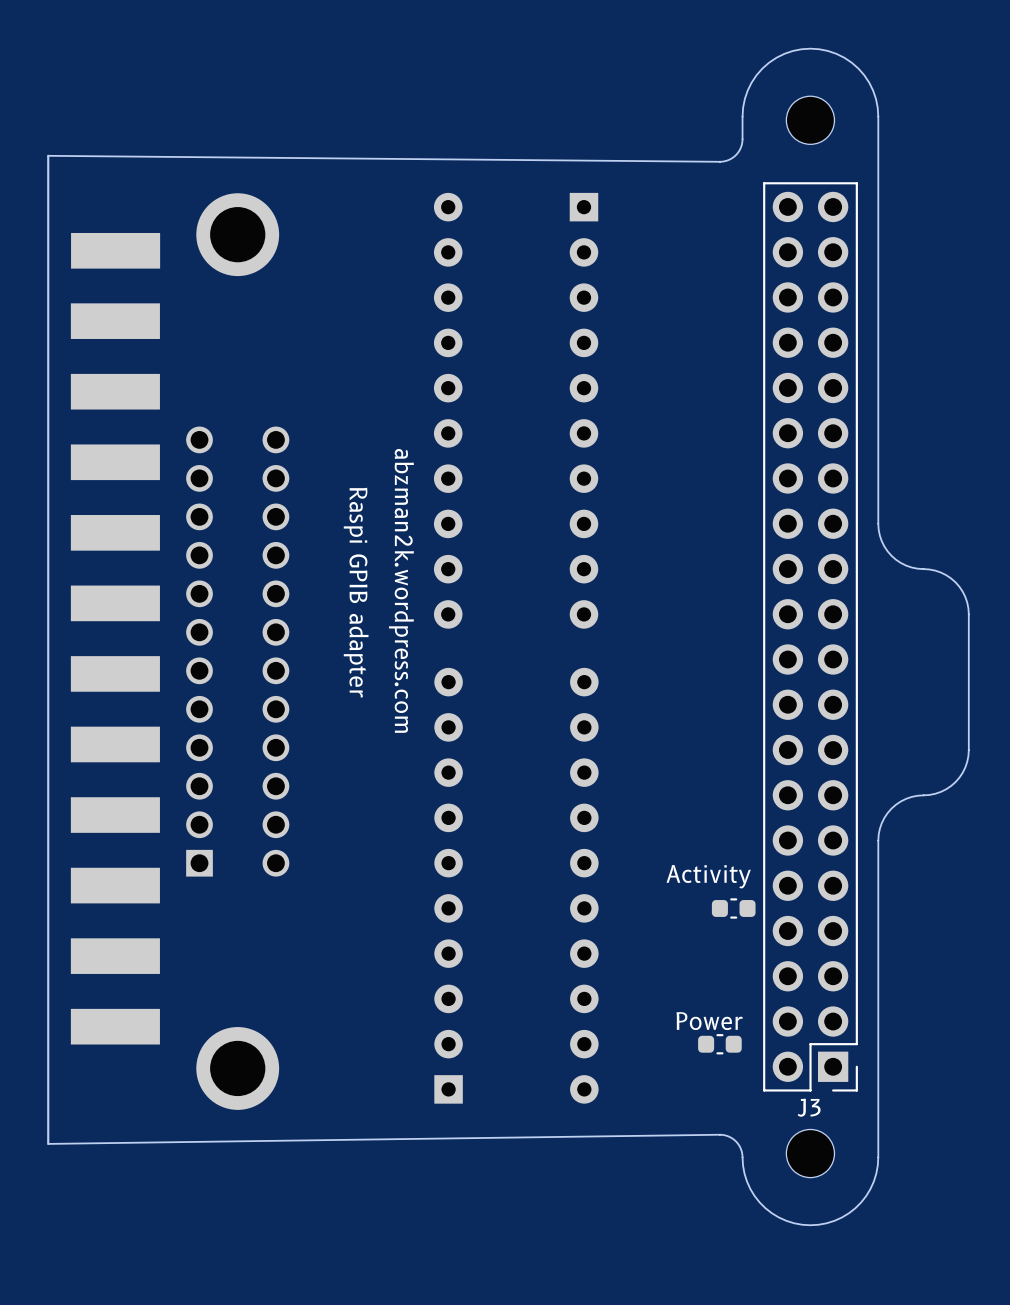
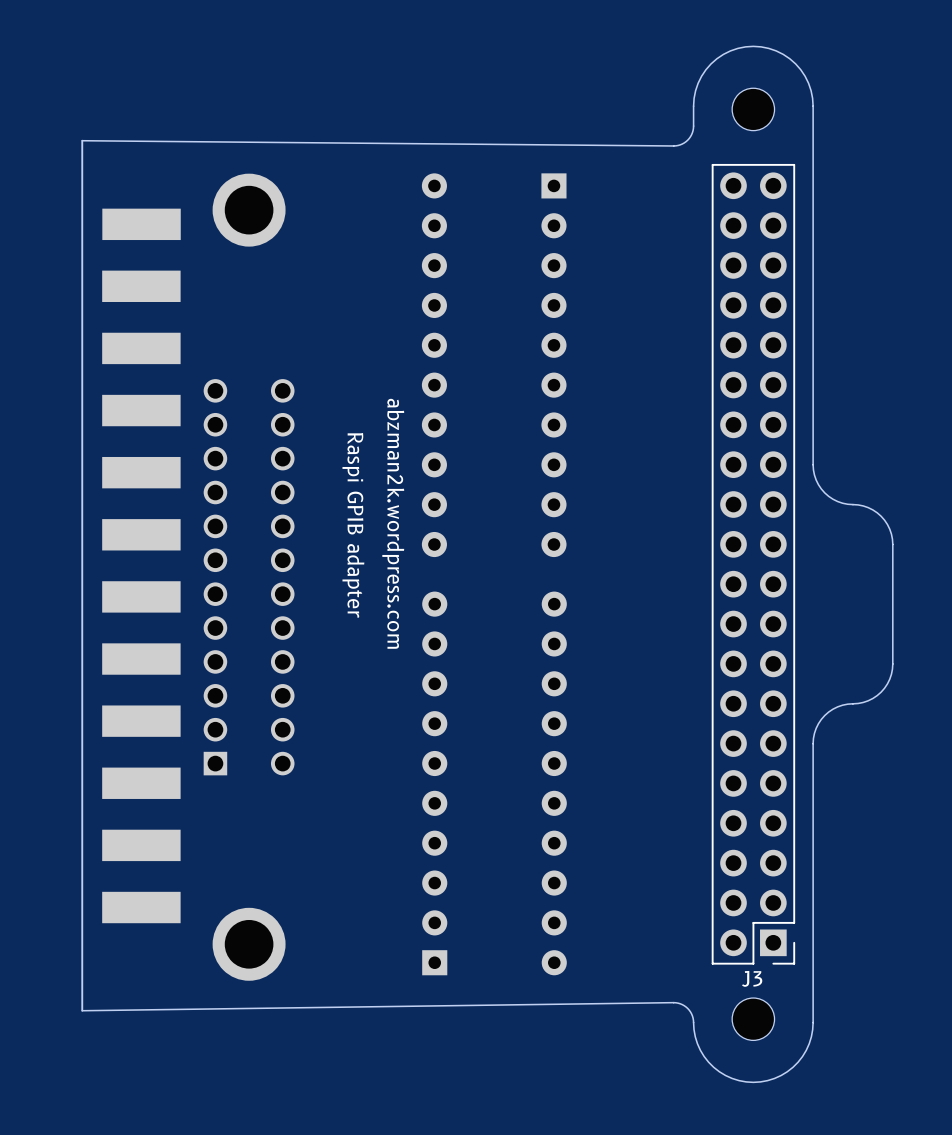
part: Activity (733, 908) -> none
part: Power (719, 1044) -> none

